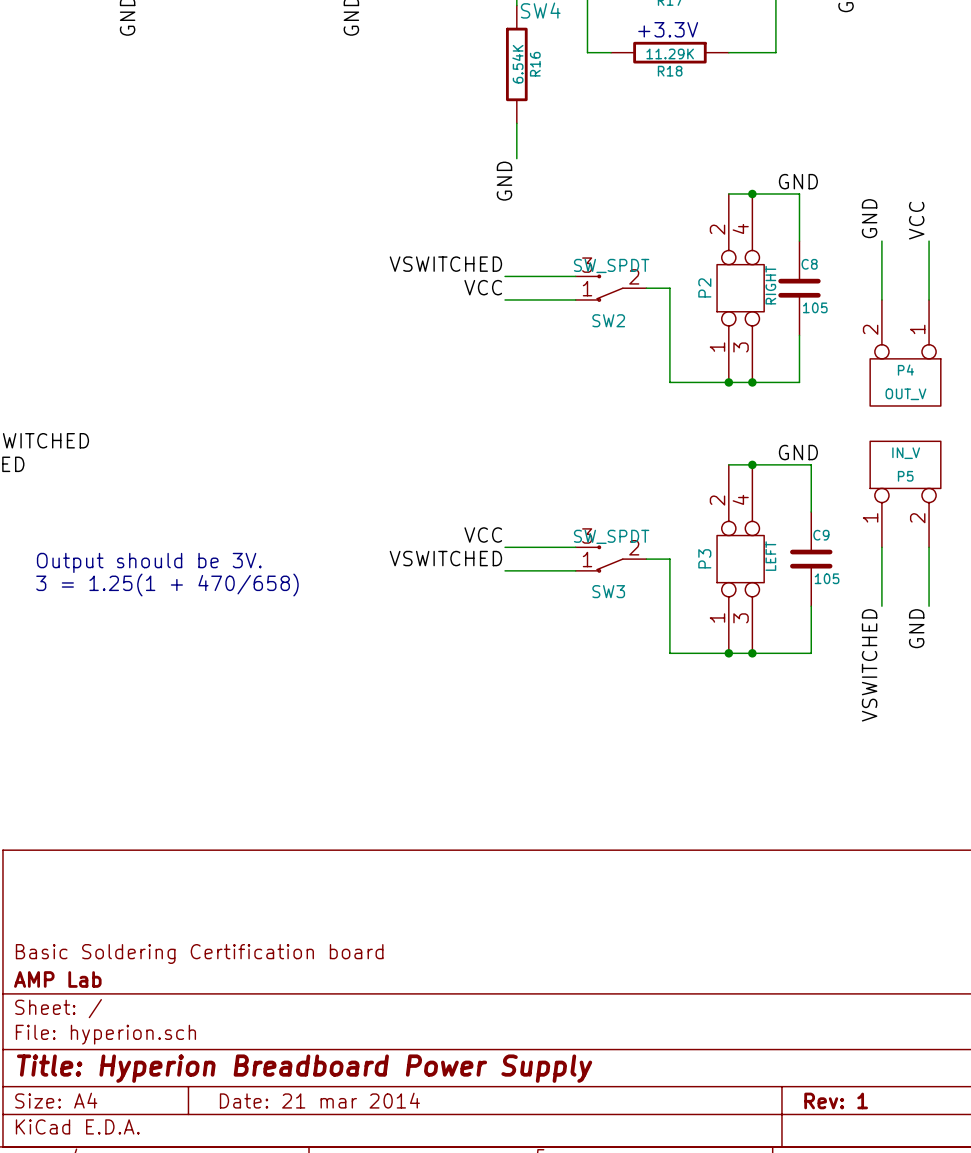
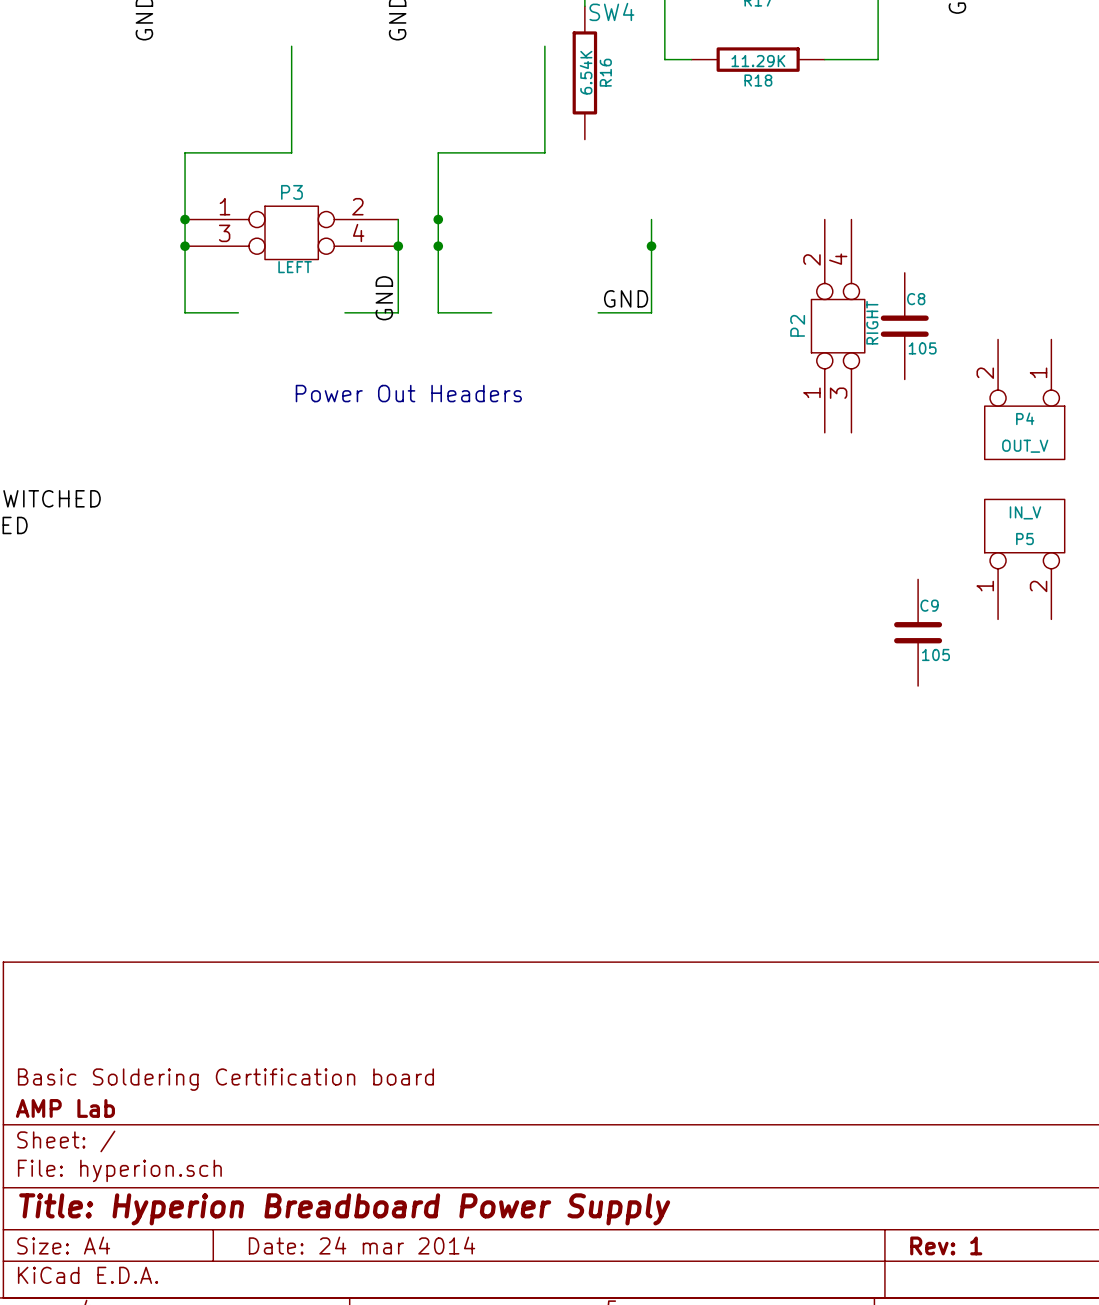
text: +3.3V (668, 29) -> none
wire: none -> (291, 46) (291, 152) (185, 152) (185, 312) (238, 312)
wire: none -> (544, 46) (544, 152) (438, 152) (438, 312) (491, 312)
wire: (516, 123) (516, 158) -> none
label: GND (504, 181) -> none
label: GND (798, 181) -> none
junction: none -> (185, 219)
wire: none -> (398, 219) (398, 312) (344, 312)
junction: none -> (438, 219)
wire: none -> (651, 219) (651, 312)
wire: (728, 193) (799, 193) (799, 241) -> none
junction: (752, 193) -> none
junction: none -> (185, 246)
junction: none -> (398, 246)
junction: none -> (438, 246)
junction: none -> (651, 246)
label: GND (869, 218) -> none
label: VCC (916, 220) -> none
wire: (881, 241) (881, 299) -> none
wire: (929, 241) (929, 299) -> none
label: none -> GND (384, 298)
label: VSWITCHED (445, 264) -> none
label: none -> GND (626, 298)
wire: (505, 276) (528, 276) -> none
label: VCC (483, 287) -> none
SW2: SW_SPDT (611, 288) -> none
wire: (646, 288) (669, 288) (669, 382) (799, 382) (799, 335) -> none
wire: (505, 299) (575, 299) -> none
text: none -> Power Out Headers (408, 393)
junction: (728, 382) -> none
junction: (752, 382) -> none
label: GND (798, 452) -> none
wire: (728, 464) (811, 464) (811, 511) -> none
junction: (752, 464) -> none
label: VCC (483, 534) -> none
wire: (505, 547) (575, 547) -> none
wire: (881, 547) (881, 606) -> none
wire: (929, 547) (929, 606) -> none
label: VSWITCHED (445, 558) -> none
SW3: SW_SPDT (611, 559) -> none
wire: (646, 559) (669, 559) (669, 653) (811, 653) (811, 606) -> none
P3 rotation: 0° (740, 559) -> 90° clockwise (291, 232)
P3 position: (740, 559) -> (291, 232)
text: Output should be 3V. (149, 562) -> none
wire: (505, 570) (575, 570) -> none
text: 3 = 1.25(1 + 470/658) (167, 585) -> none
label: GND (916, 628) -> none
junction: (728, 653) -> none
junction: (752, 653) -> none
label: VSWITCHED (869, 665) -> none
title block: Date: 21 mar 2014 (319, 1100) -> Date: 24 mar 2014 (362, 1245)

